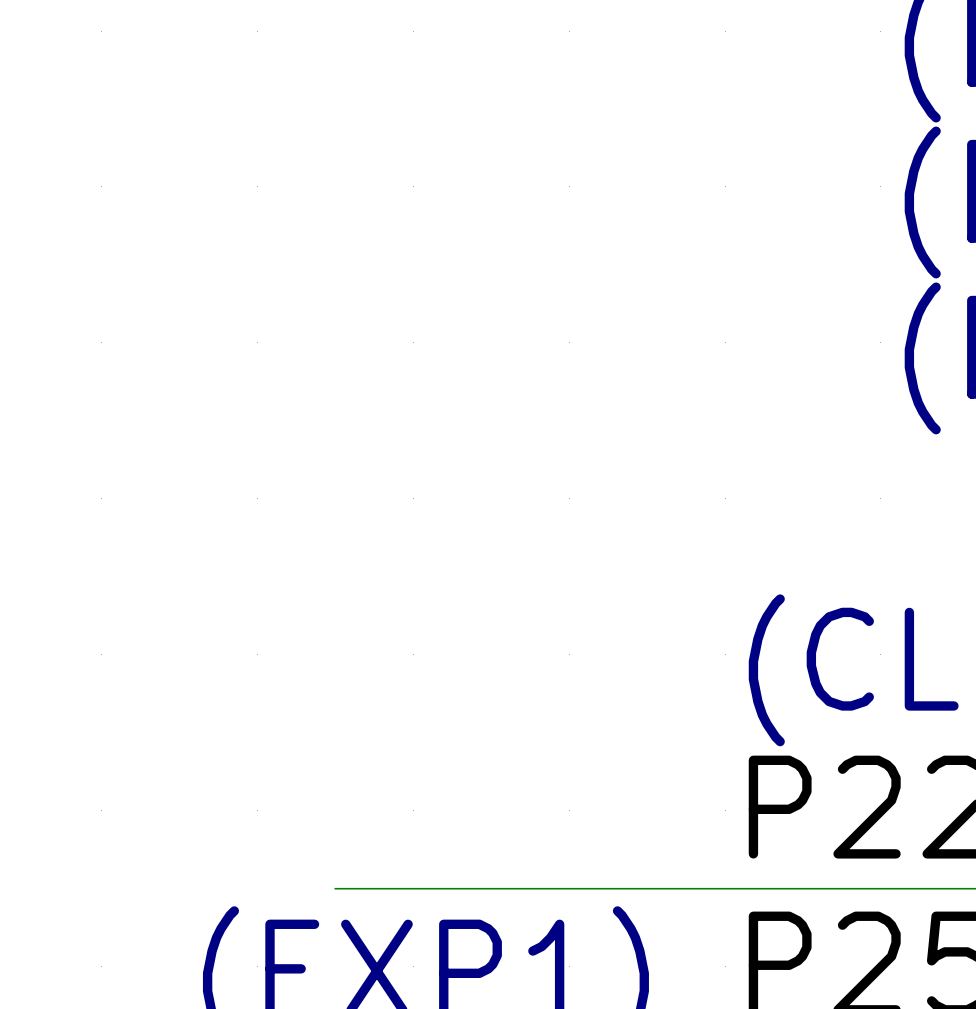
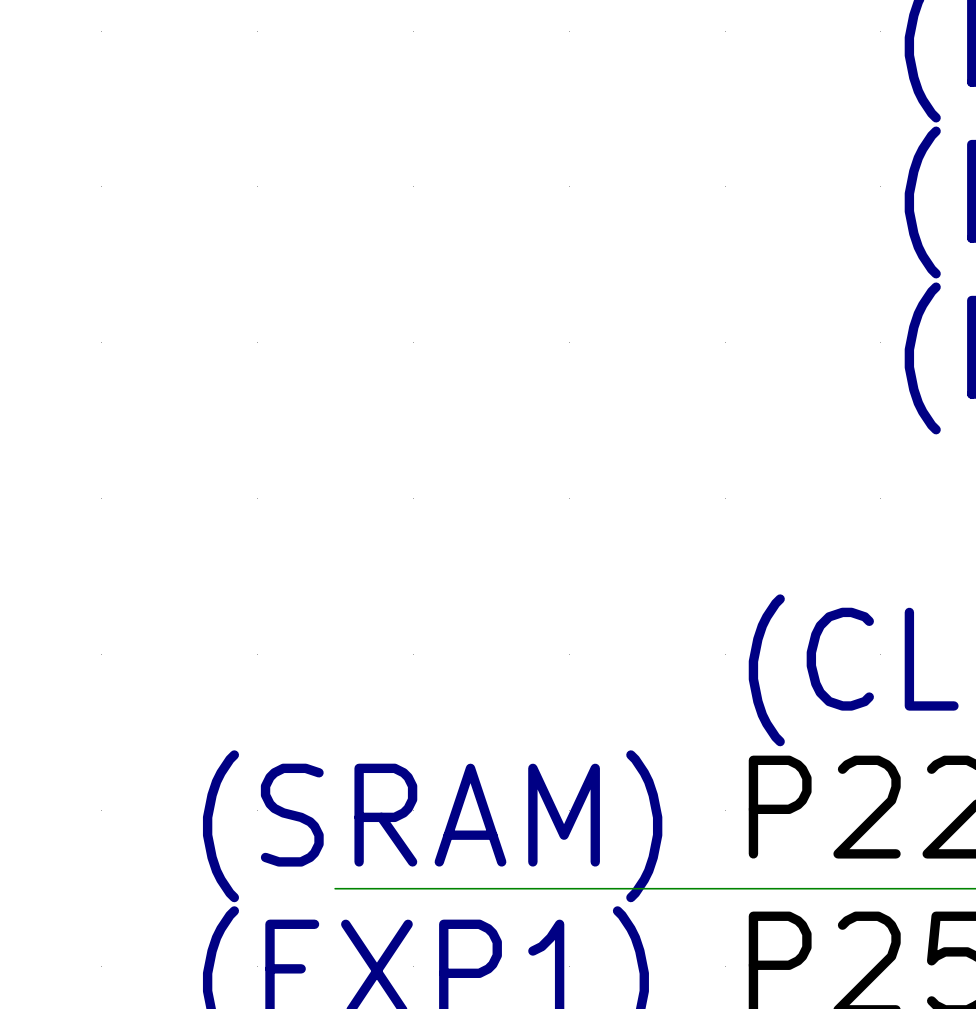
text: none -> (SRAM) (432, 826)

